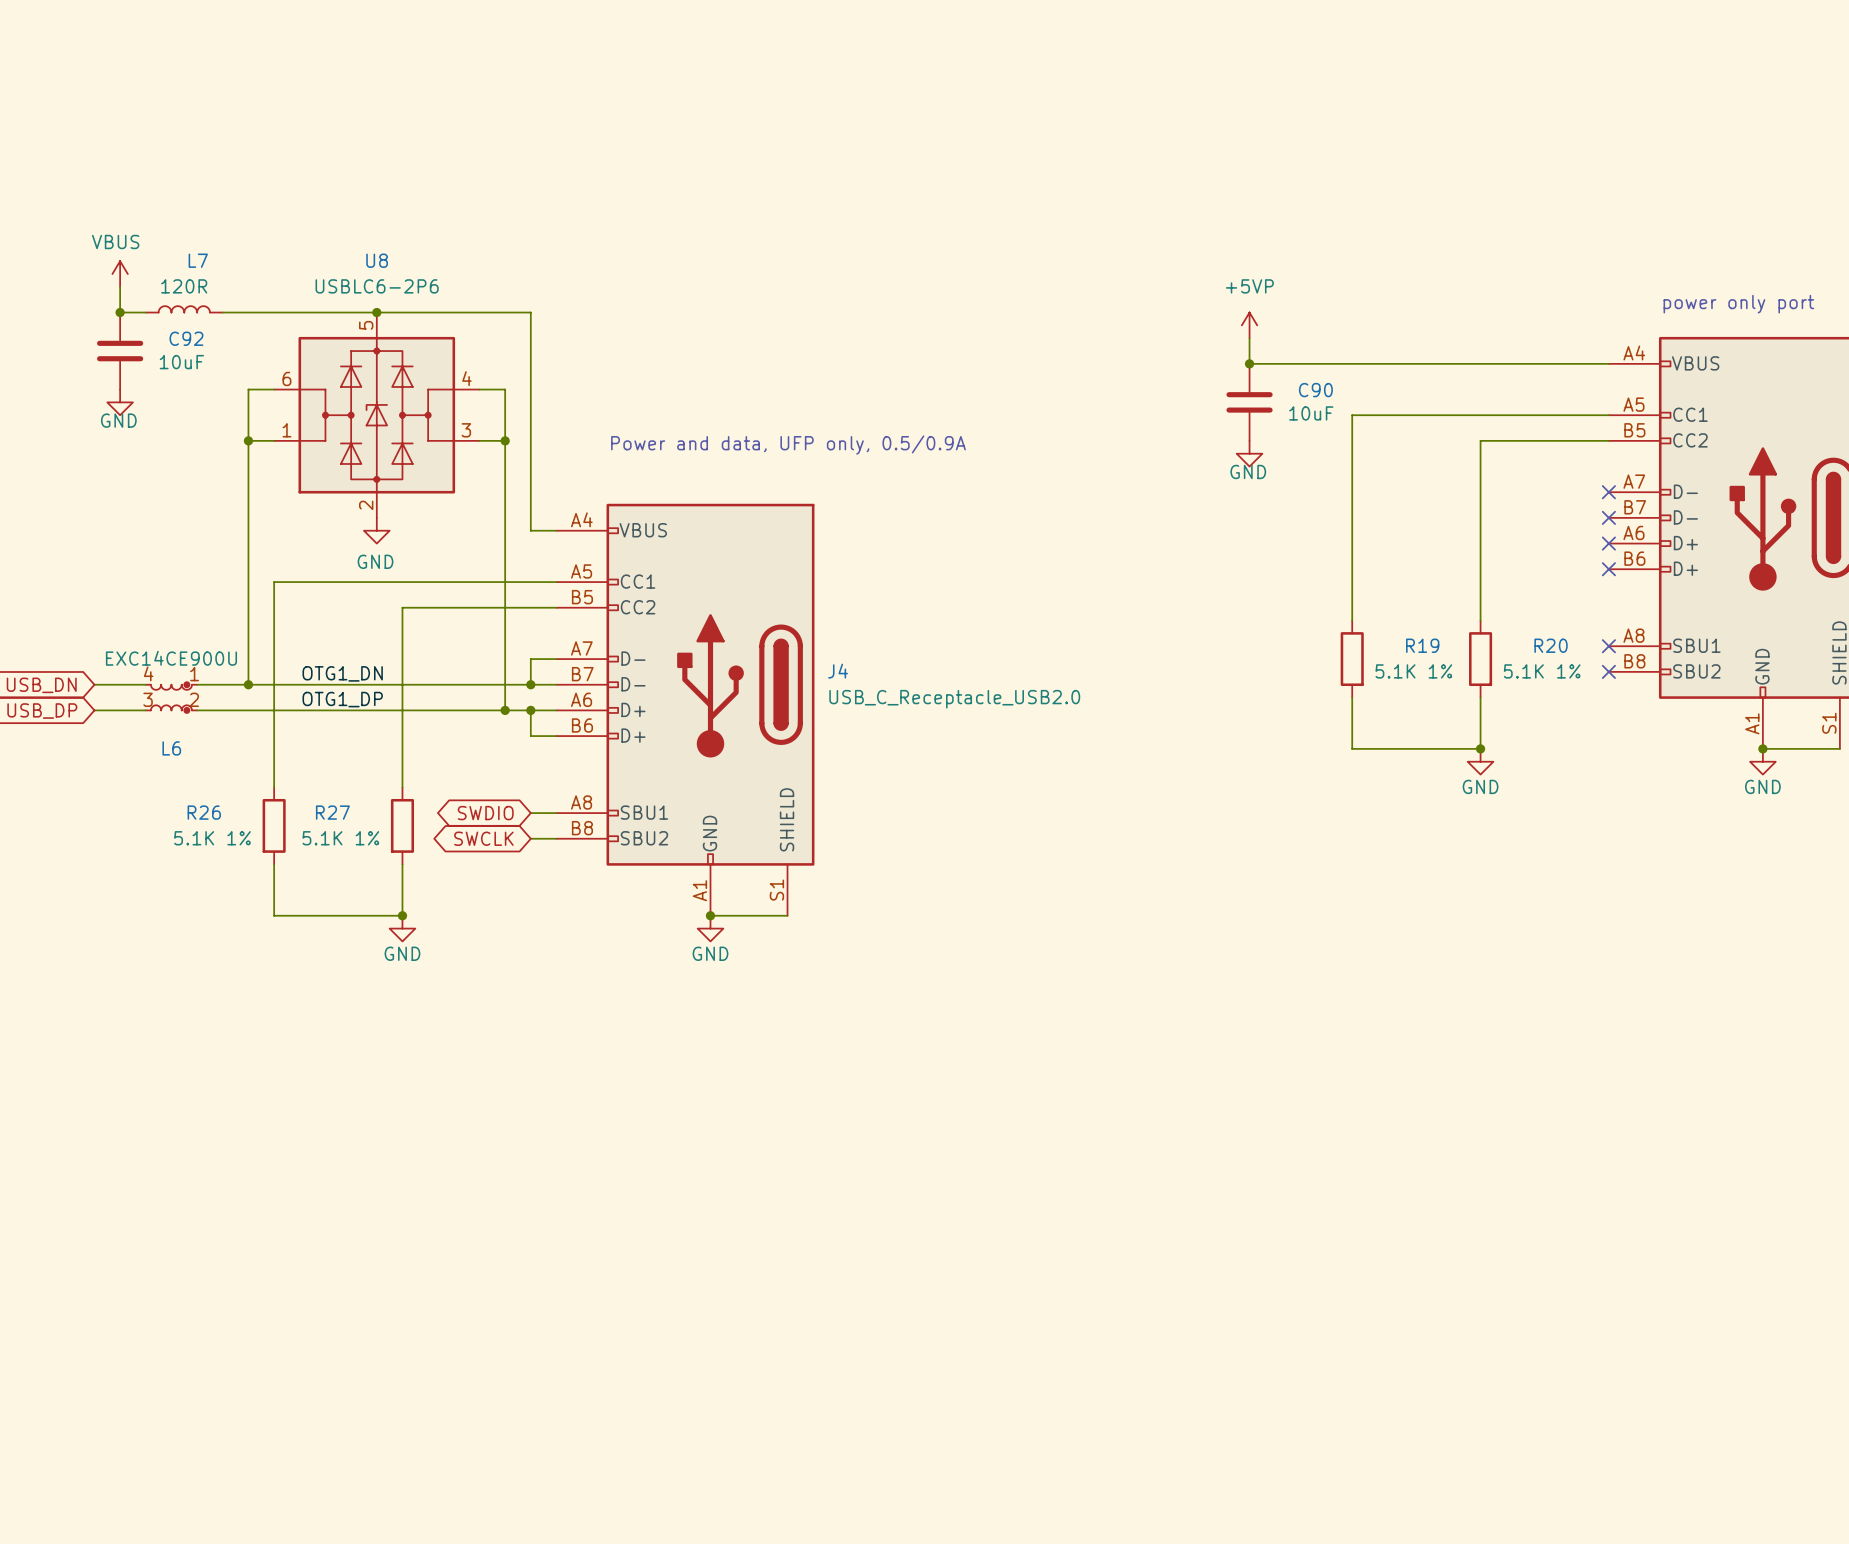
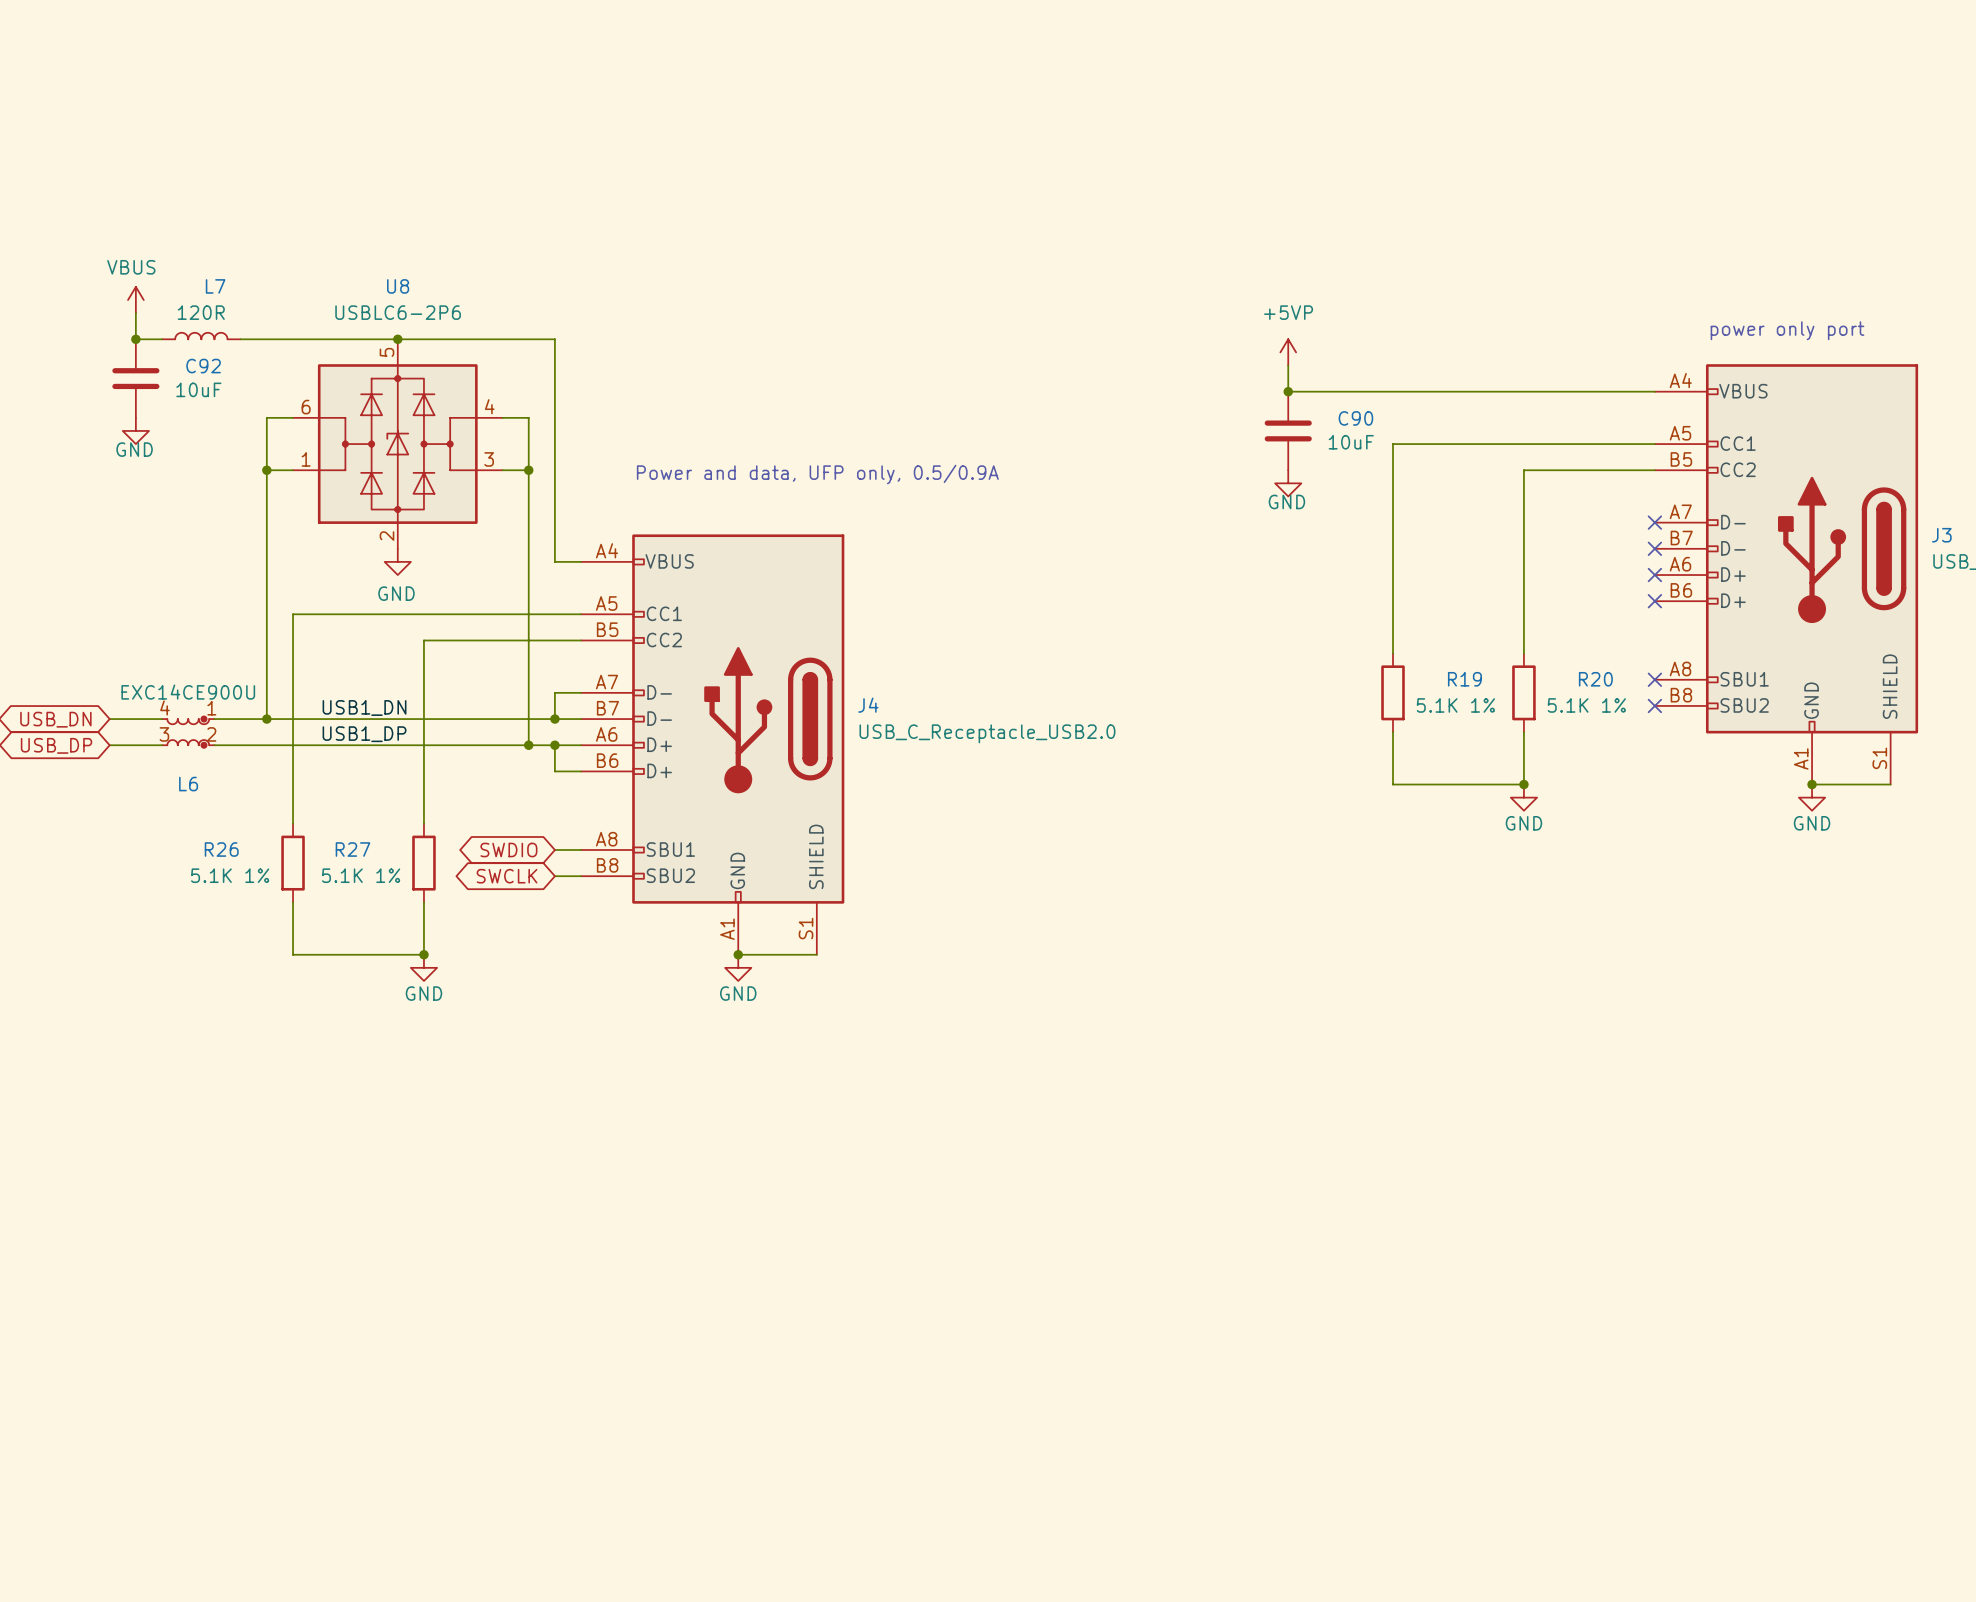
label: OTG1_DN (342, 673) -> USB1_DN (364, 707)
label: OTG1_DP (342, 699) -> USB1_DP (364, 734)

